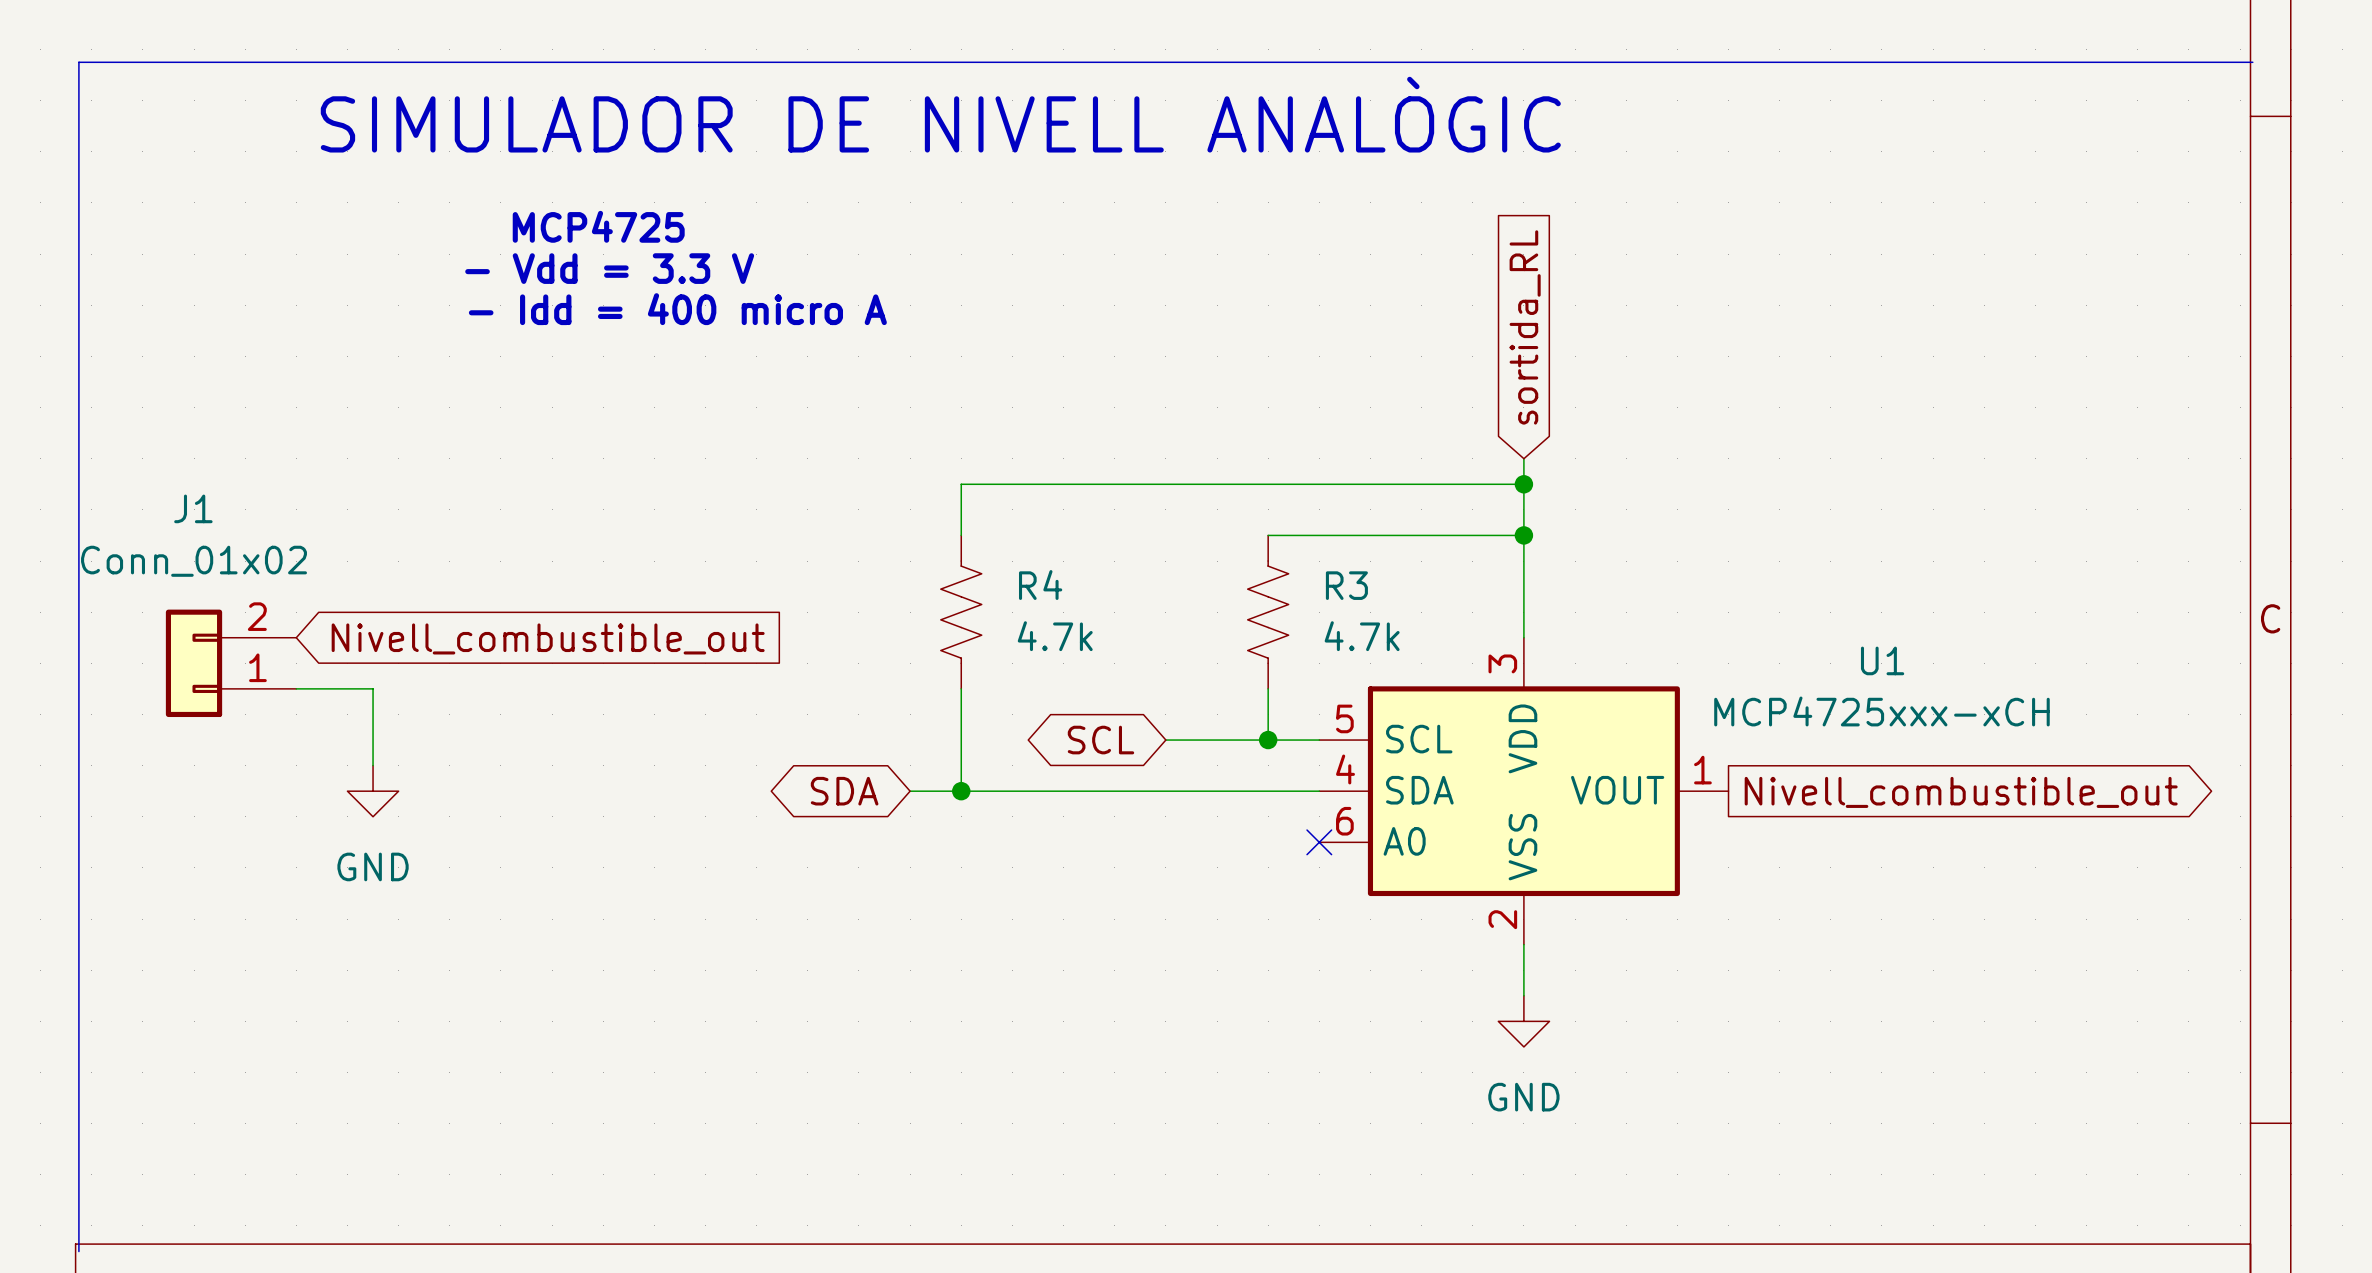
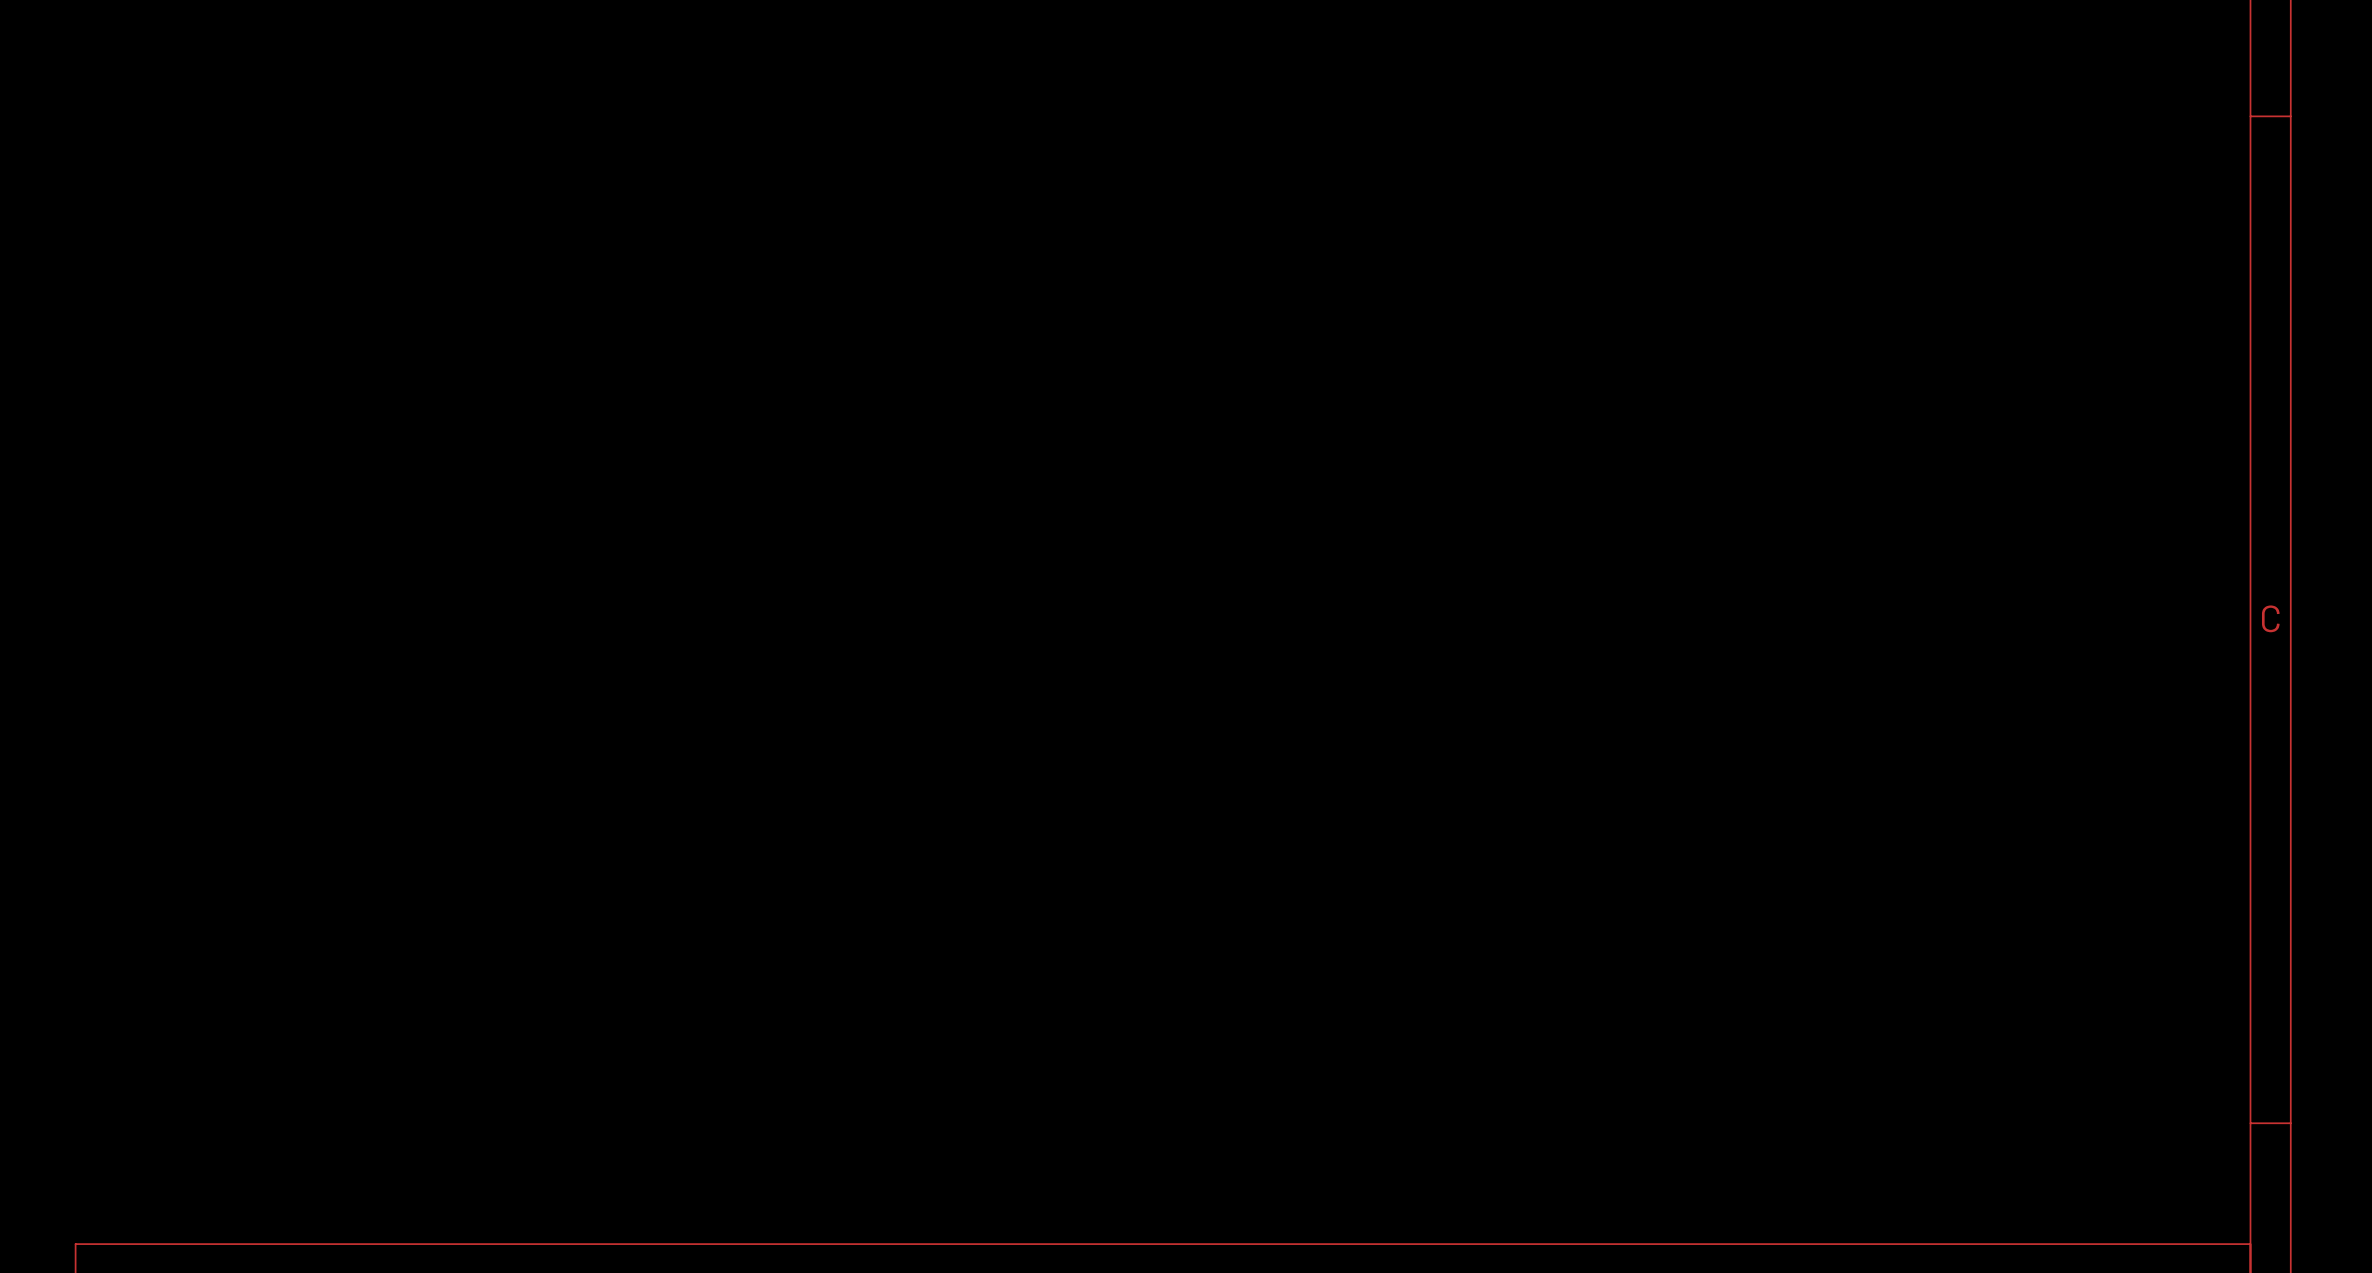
line: (2252, 62) (78, 62) (78, 1251) -> none
text: SIMULADOR DE NIVELL ANALÒGIC (940, 114) -> none
text: MCP4725 (598, 226) -> none
text: - Vdd = 3.3 V (609, 268) -> none
text: - Idd = 400 micro A (677, 309) -> none
global label: sortida_RL (1525, 327) -> none
wire: (1523, 458) (1523, 637) -> none
wire: (1523, 484) (961, 484) (961, 535) -> none
junction: (1523, 484) -> none
wire: (1268, 535) (1523, 535) -> none
junction: (1523, 535) -> none
R4: 4.7k (961, 612) -> none
R3: 4.7k (1268, 612) -> none
global label: Nivell_combustible_out (548, 638) -> none
J1: Conn_01x02 (231, 663) -> none
wire: (296, 688) (373, 688) (373, 765) -> none
wire: (961, 688) (961, 791) -> none
wire: (1268, 688) (1268, 740) -> none
global label: SCL (1100, 740) -> none
wire: (1165, 740) (1319, 740) -> none
junction: (1268, 740) -> none
power symbol: GND (373, 791) -> none
global label: SDA (844, 791) -> none
wire: (910, 791) (1319, 791) -> none
junction: (961, 791) -> none
U1: MCP4725xxx-xCH (1523, 791) -> none
global label: Nivell_combustible_out (1961, 792) -> none
no-connect mark: (1319, 842) -> none
wire: (1523, 944) (1523, 995) -> none
power symbol: GND (1523, 1021) -> none

